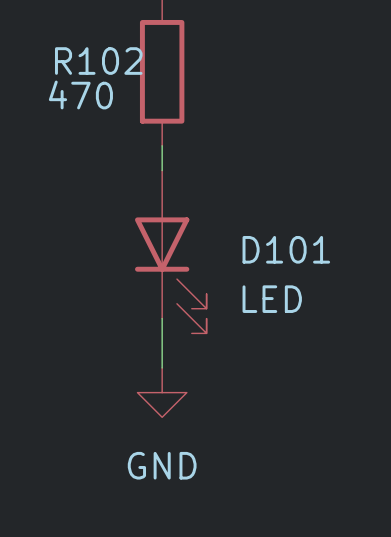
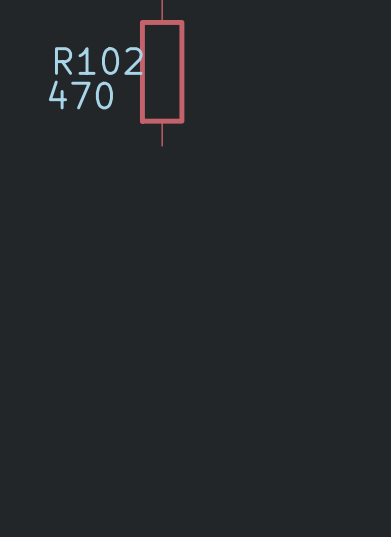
wire: (162, 145) (162, 170) -> none
D101: LED (170, 251) -> none
wire: (162, 318) (162, 367) -> none
power symbol: GND (162, 392) -> none

